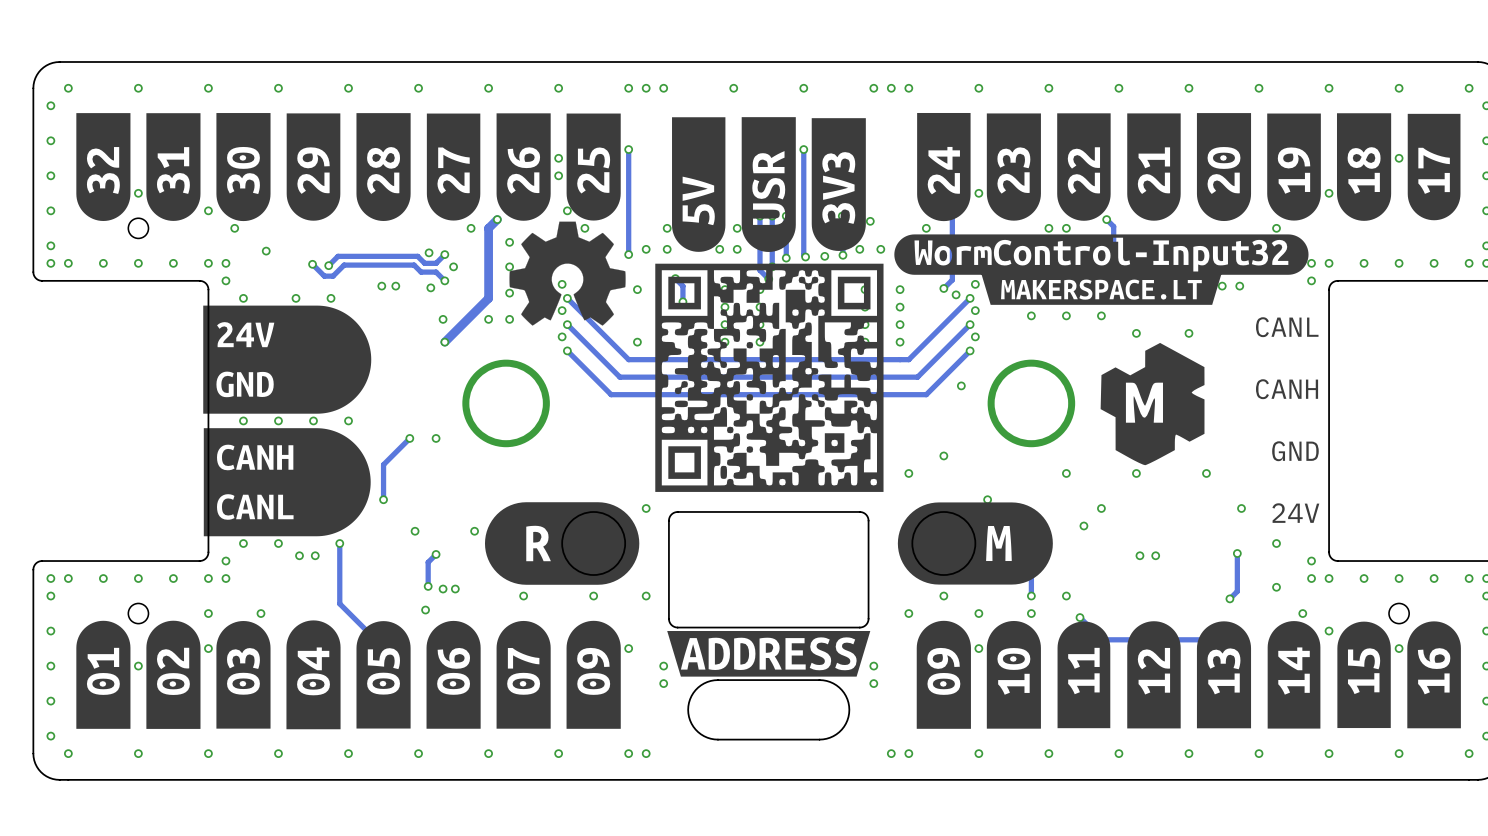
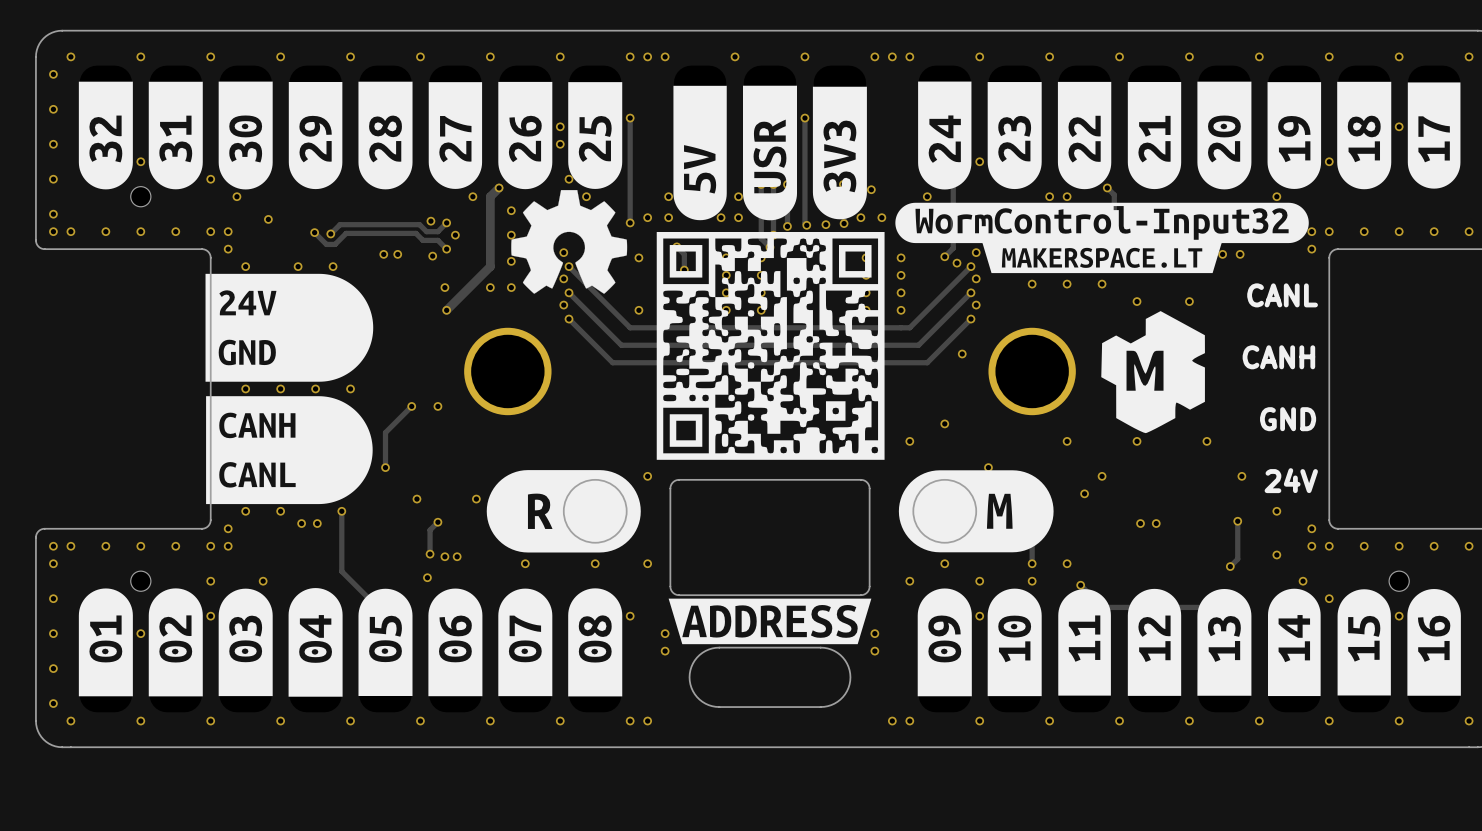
drawing shape: [566, 620, 621, 729] -> [568, 588, 623, 697]

